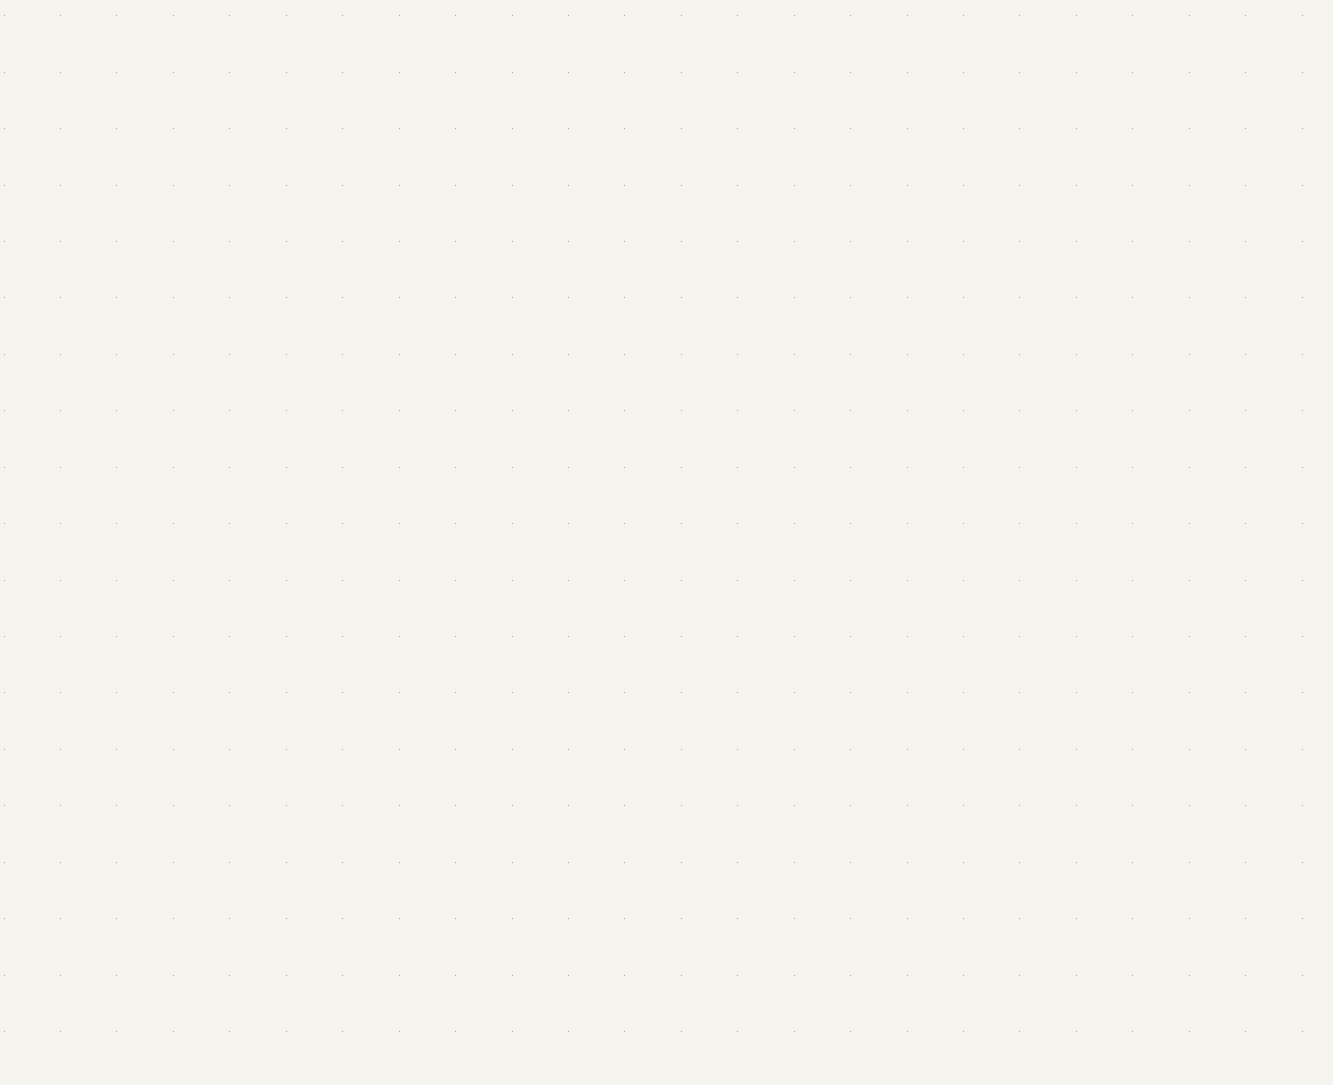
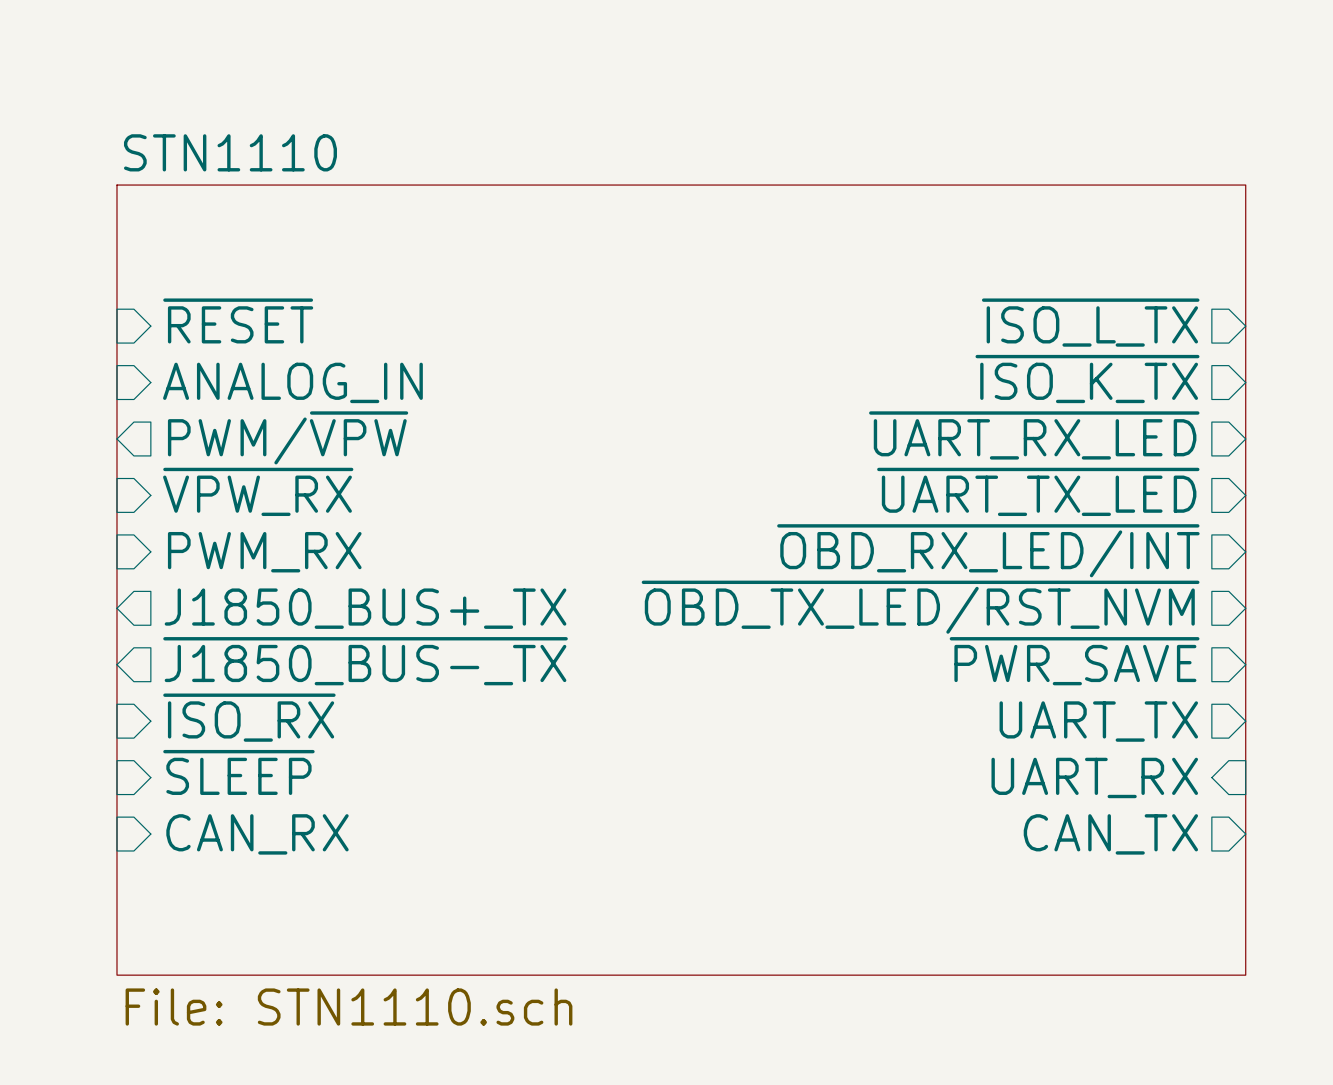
sheet pin: none -> ~{RESET} (238, 320)
sheet pin: none -> ~{ISO_L_TX} (1090, 322)
sheet pin: none -> ~{ISO_K_TX} (1087, 379)
sheet pin: none -> ANALOG_IN (292, 382)
sheet pin: none -> ~{UART_RX_LED} (1034, 435)
sheet pin: none -> PWM/~{VPW} (288, 437)
sheet pin: none -> ~{VPW_RX} (258, 491)
sheet pin: none -> ~{UART_TX_LED} (1038, 491)
sheet pin: none -> ~{OBD_RX_LED/INT} (988, 550)
sheet pin: none -> PWM_RX (264, 552)
sheet STN1110: none -> File: STN1110.sch (681, 580)
sheet pin: none -> ~{OBD_TX_LED/RST_NVM} (920, 607)
sheet pin: none -> J1850_BUS+_TX (365, 608)
sheet pin: none -> ~{J1850_BUS-_TX} (365, 661)
sheet pin: none -> ~{PWR_SAVE} (1074, 661)
sheet pin: none -> ~{ISO_RX} (249, 717)
sheet pin: none -> UART_TX (1098, 721)
sheet pin: none -> ~{SLEEP} (238, 772)
sheet pin: none -> UART_RX (1094, 777)
sheet pin: none -> CAN_RX (257, 834)
sheet pin: none -> CAN_TX (1110, 834)

